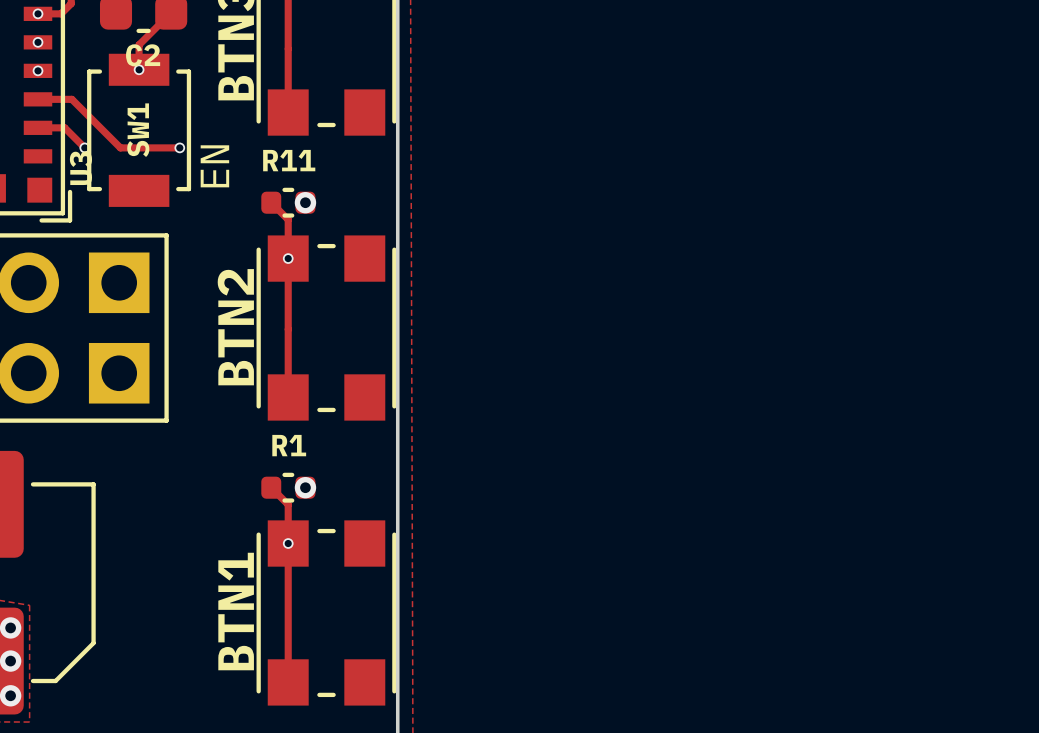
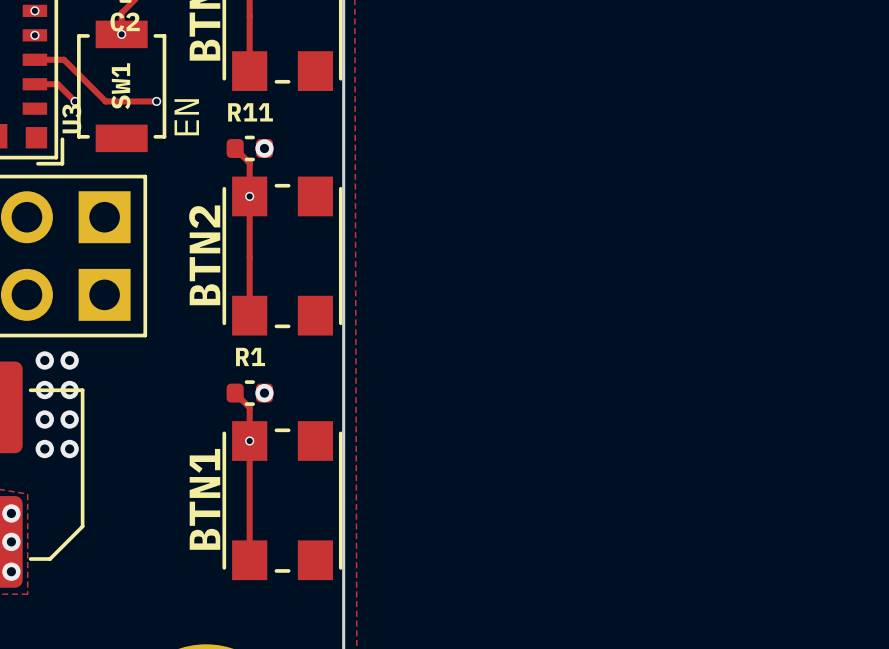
via: none -> (44, 360)
via: none -> (69, 360)
via: none -> (44, 389)
via: none -> (69, 389)
via: none -> (44, 419)
via: none -> (69, 419)
via: none -> (44, 449)
via: none -> (69, 449)

